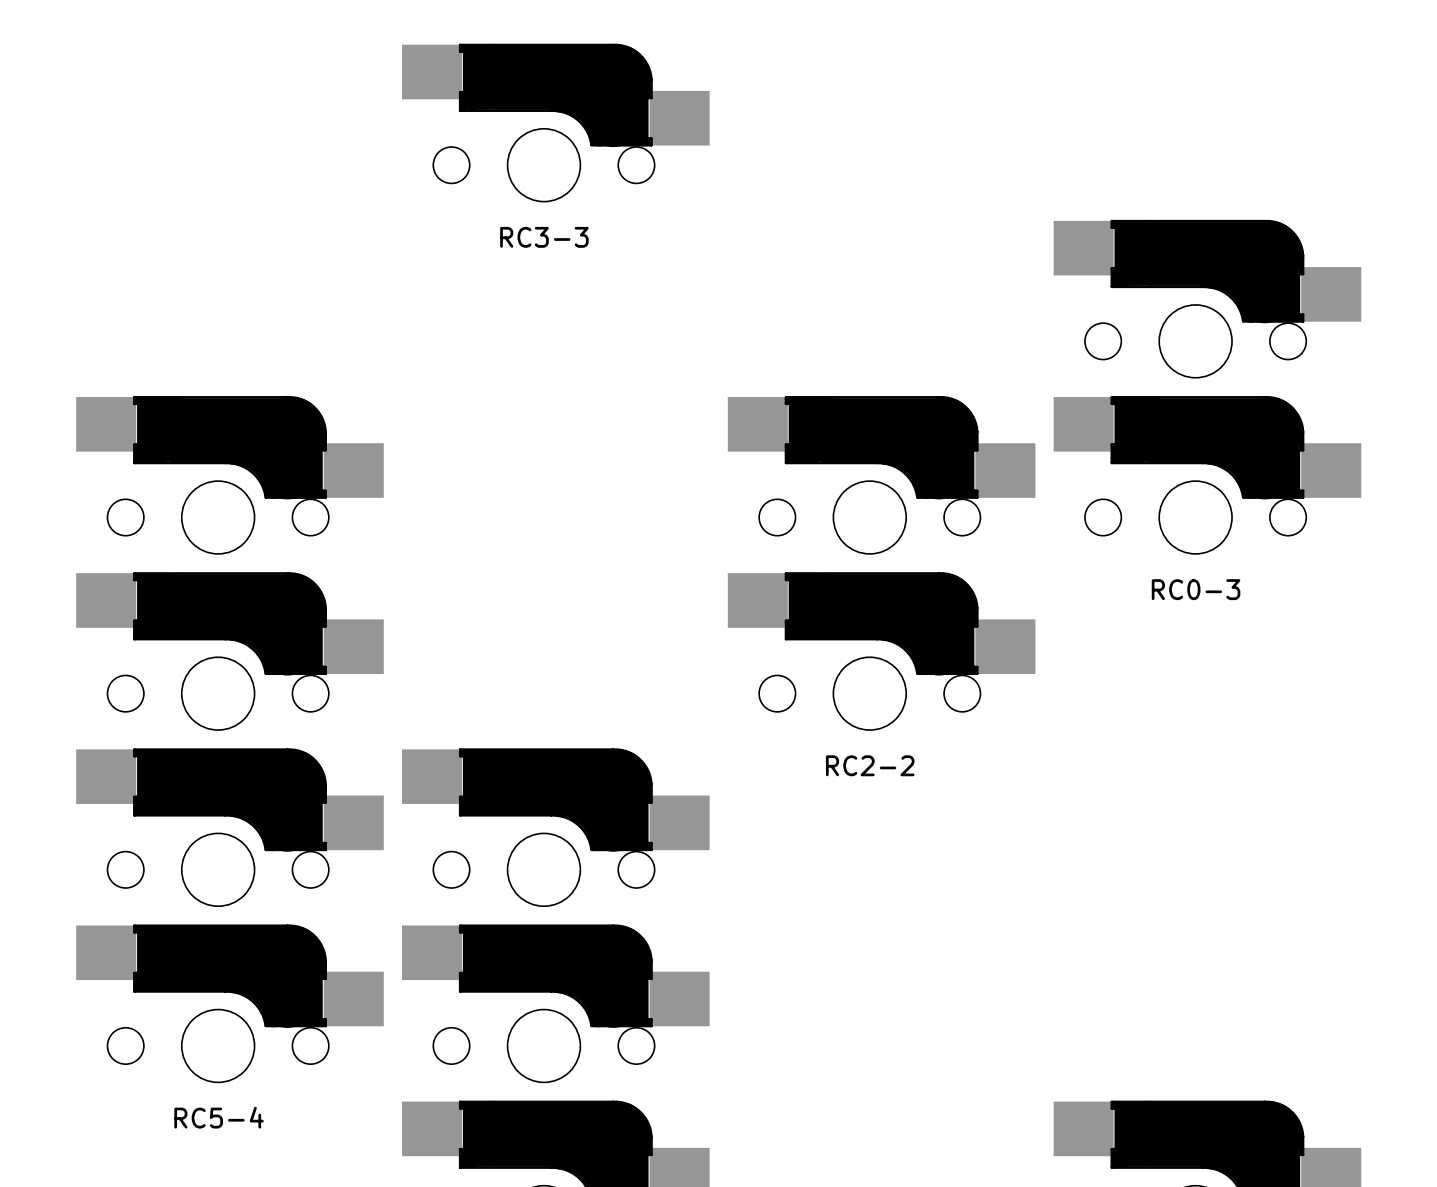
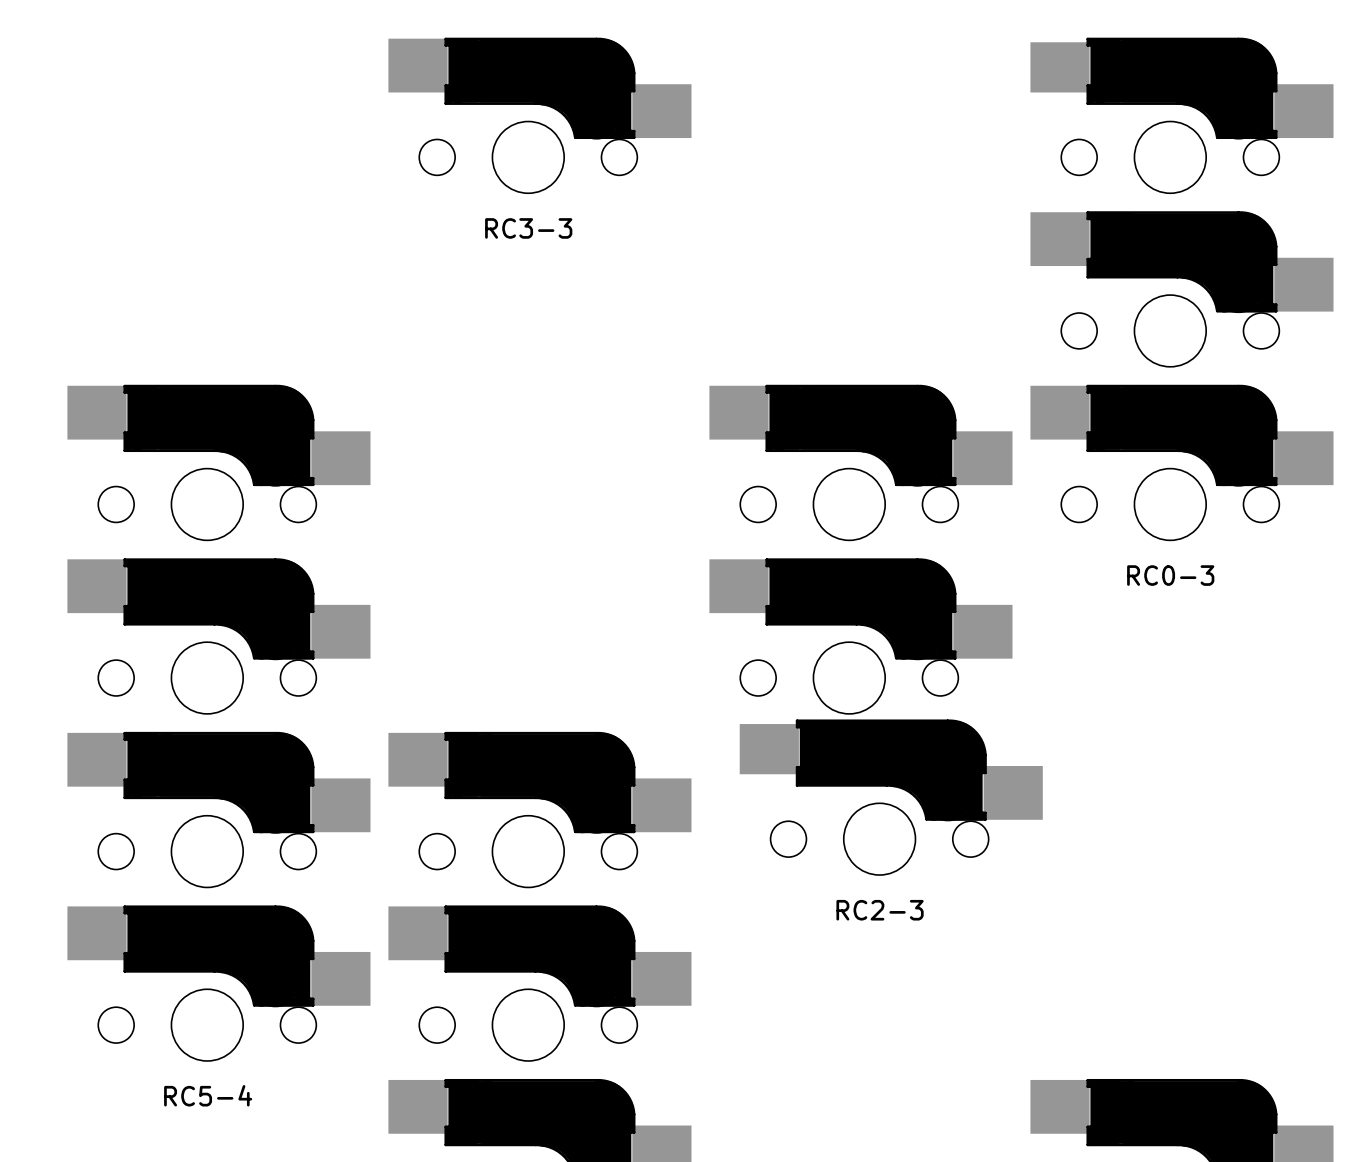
part: none -> (1181, 115)
RC2-3: none -> (891, 797)

